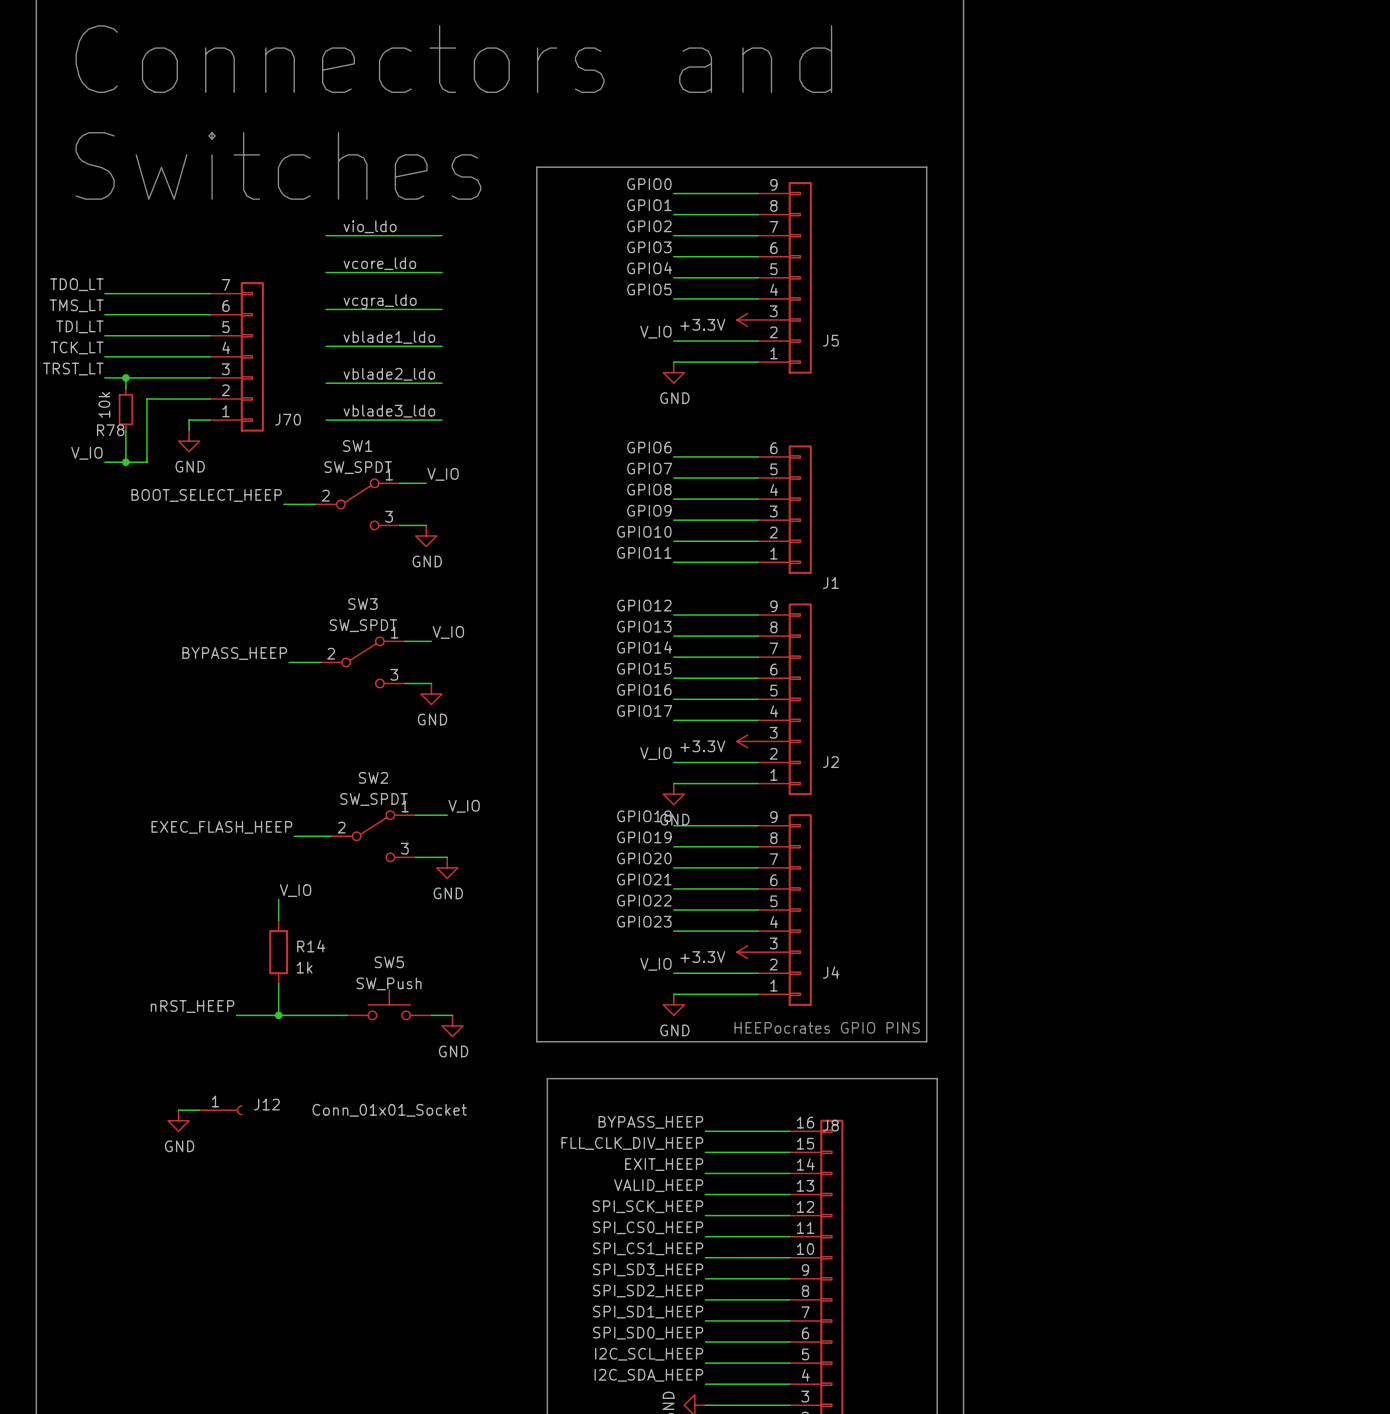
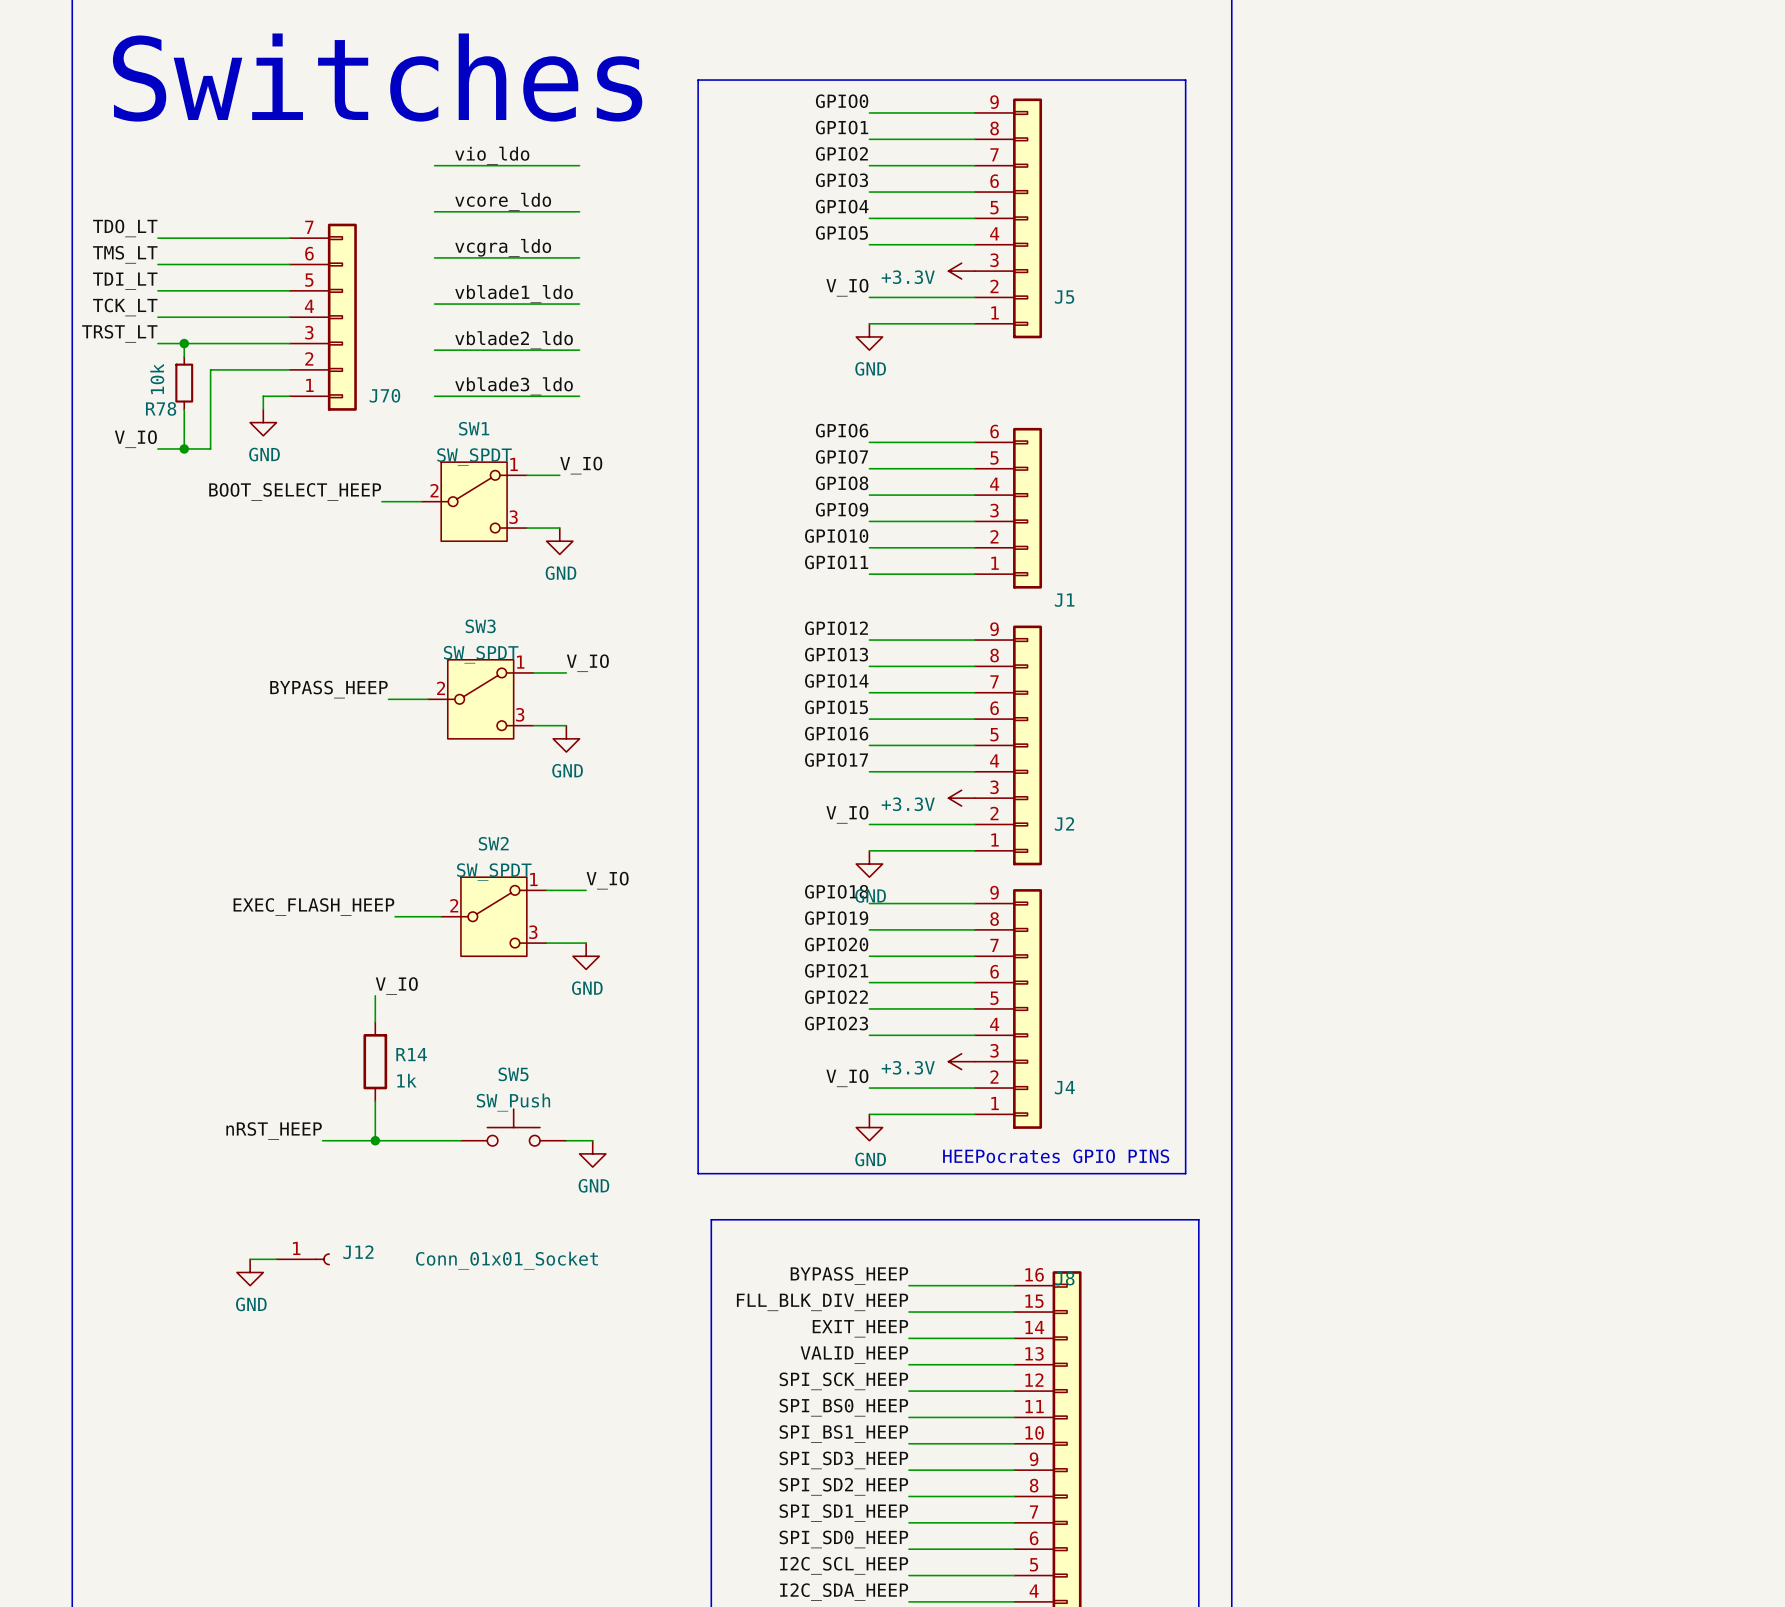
SW1 symbol: [315, 479, 400, 530] -> [421, 462, 527, 542]
SW3 symbol: [320, 637, 406, 688] -> [428, 659, 534, 739]
SW2 symbol: [331, 810, 416, 862] -> [441, 877, 547, 957]
label: FLL_CLK_DIV_HEEP (632, 1143) -> FLL_BLK_DIV_HEEP (822, 1302)
label: SPI_CS0_HEEP (648, 1227) -> SPI_BS0_HEEP (843, 1407)
label: SPI_CS1_HEEP (648, 1248) -> SPI_BS1_HEEP (843, 1434)

